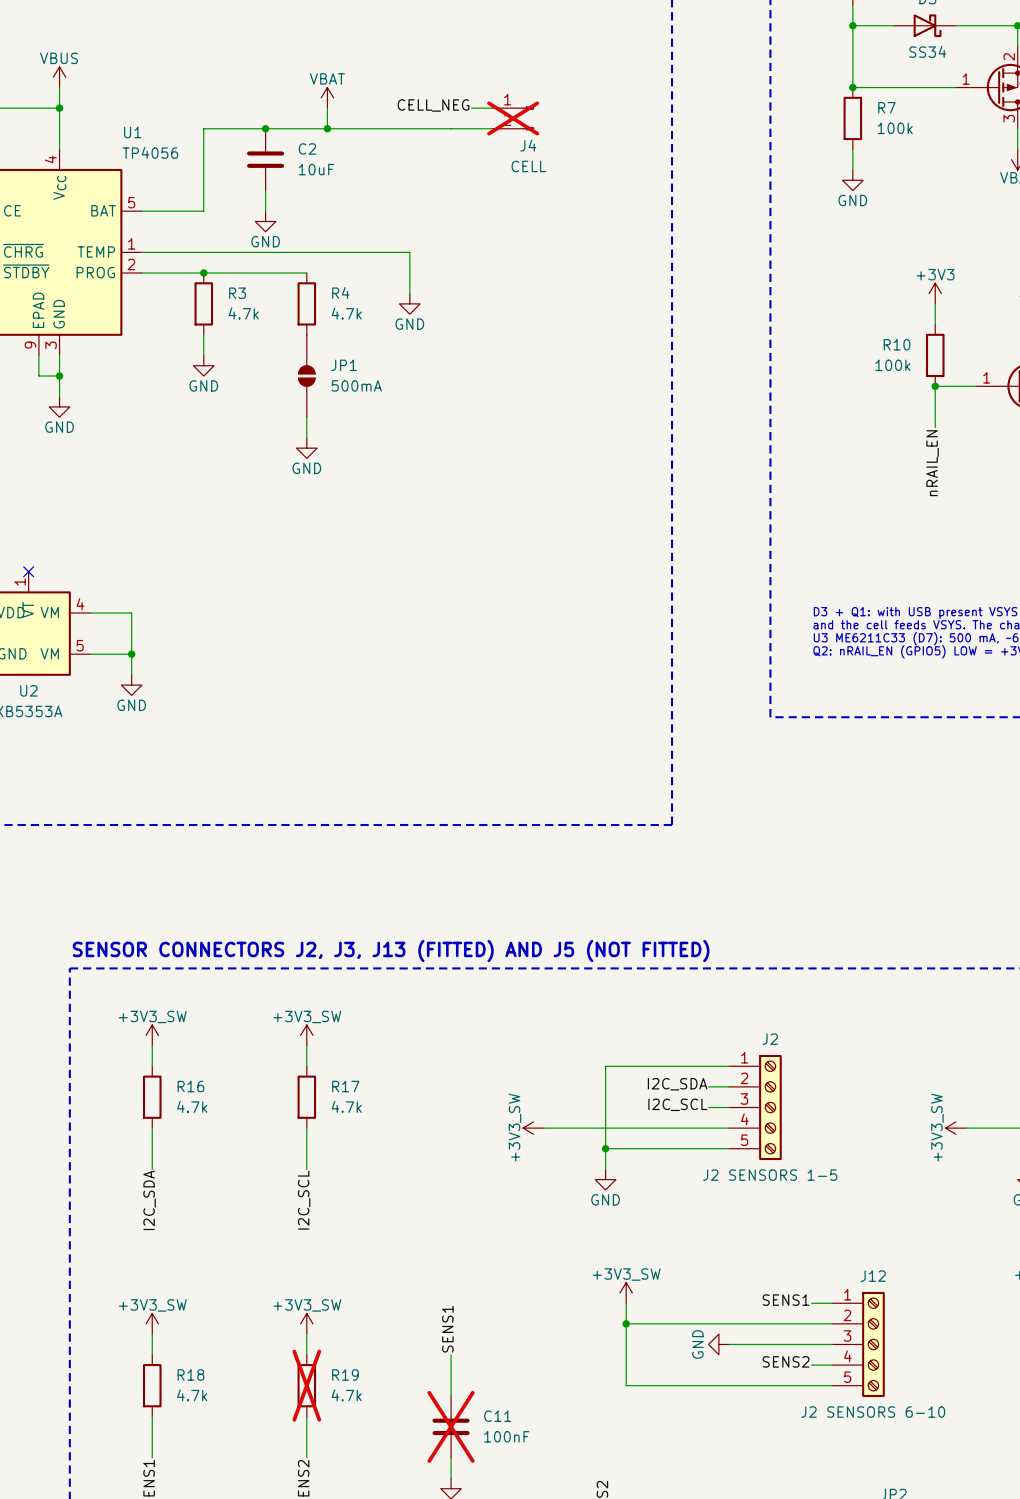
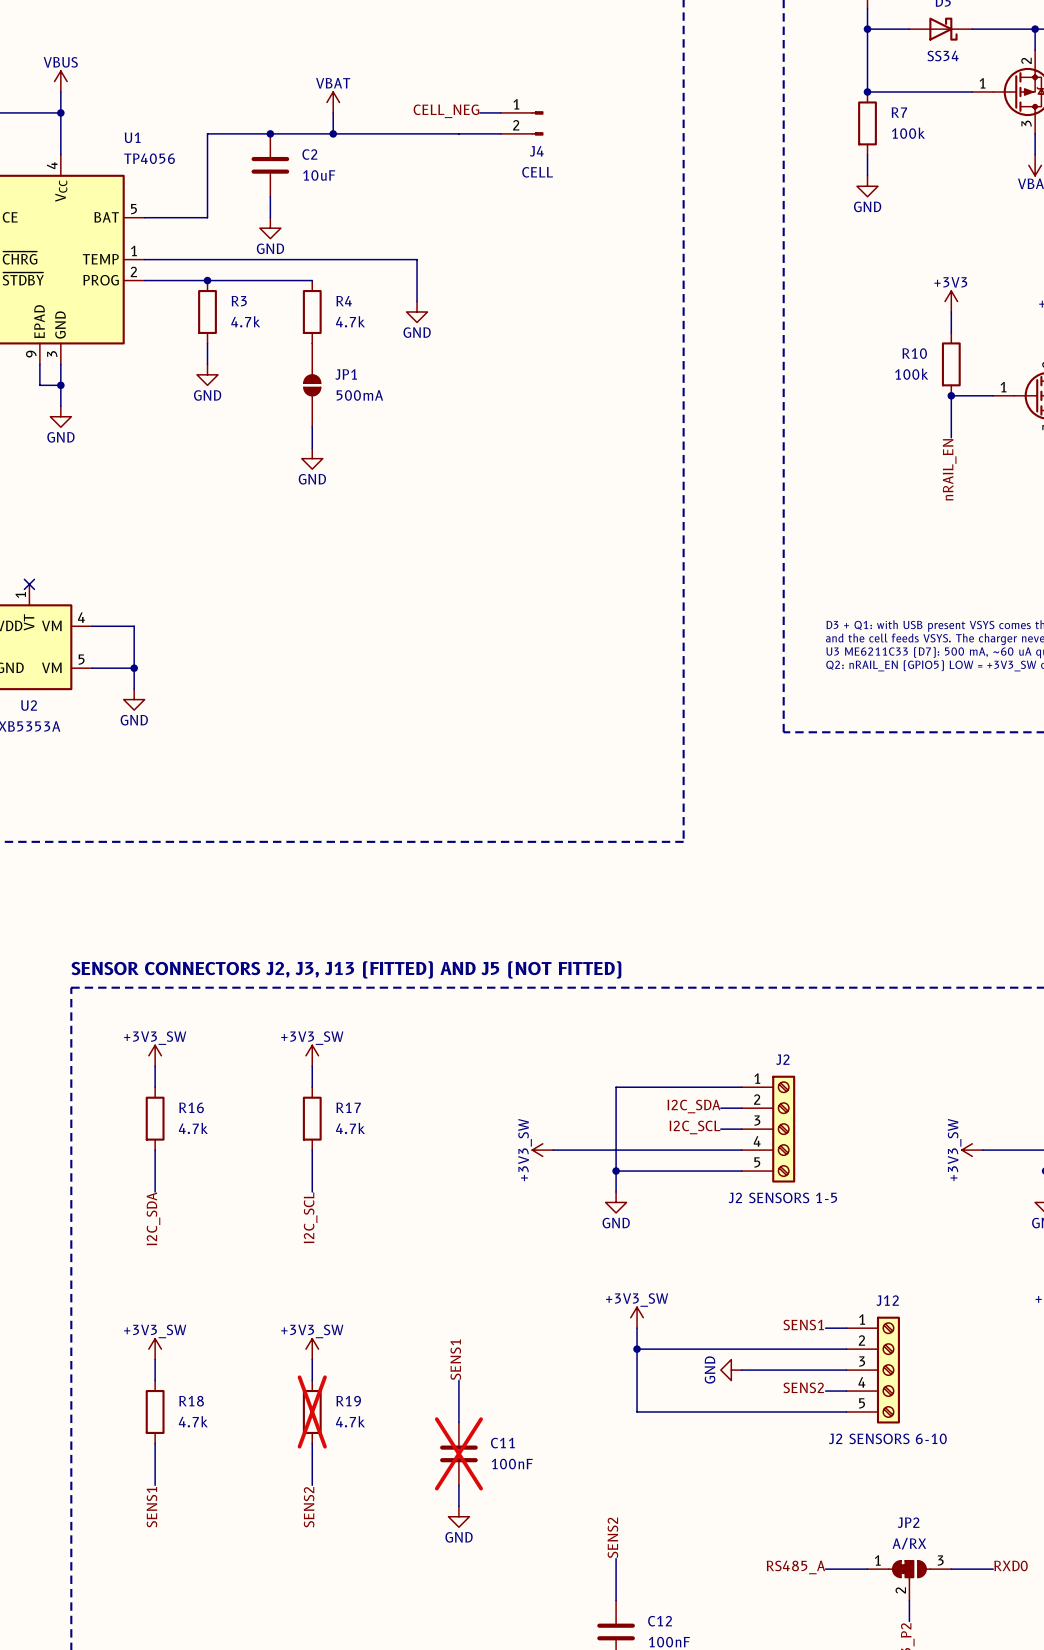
J4 do-not-place cross: (513, 118) -> none

